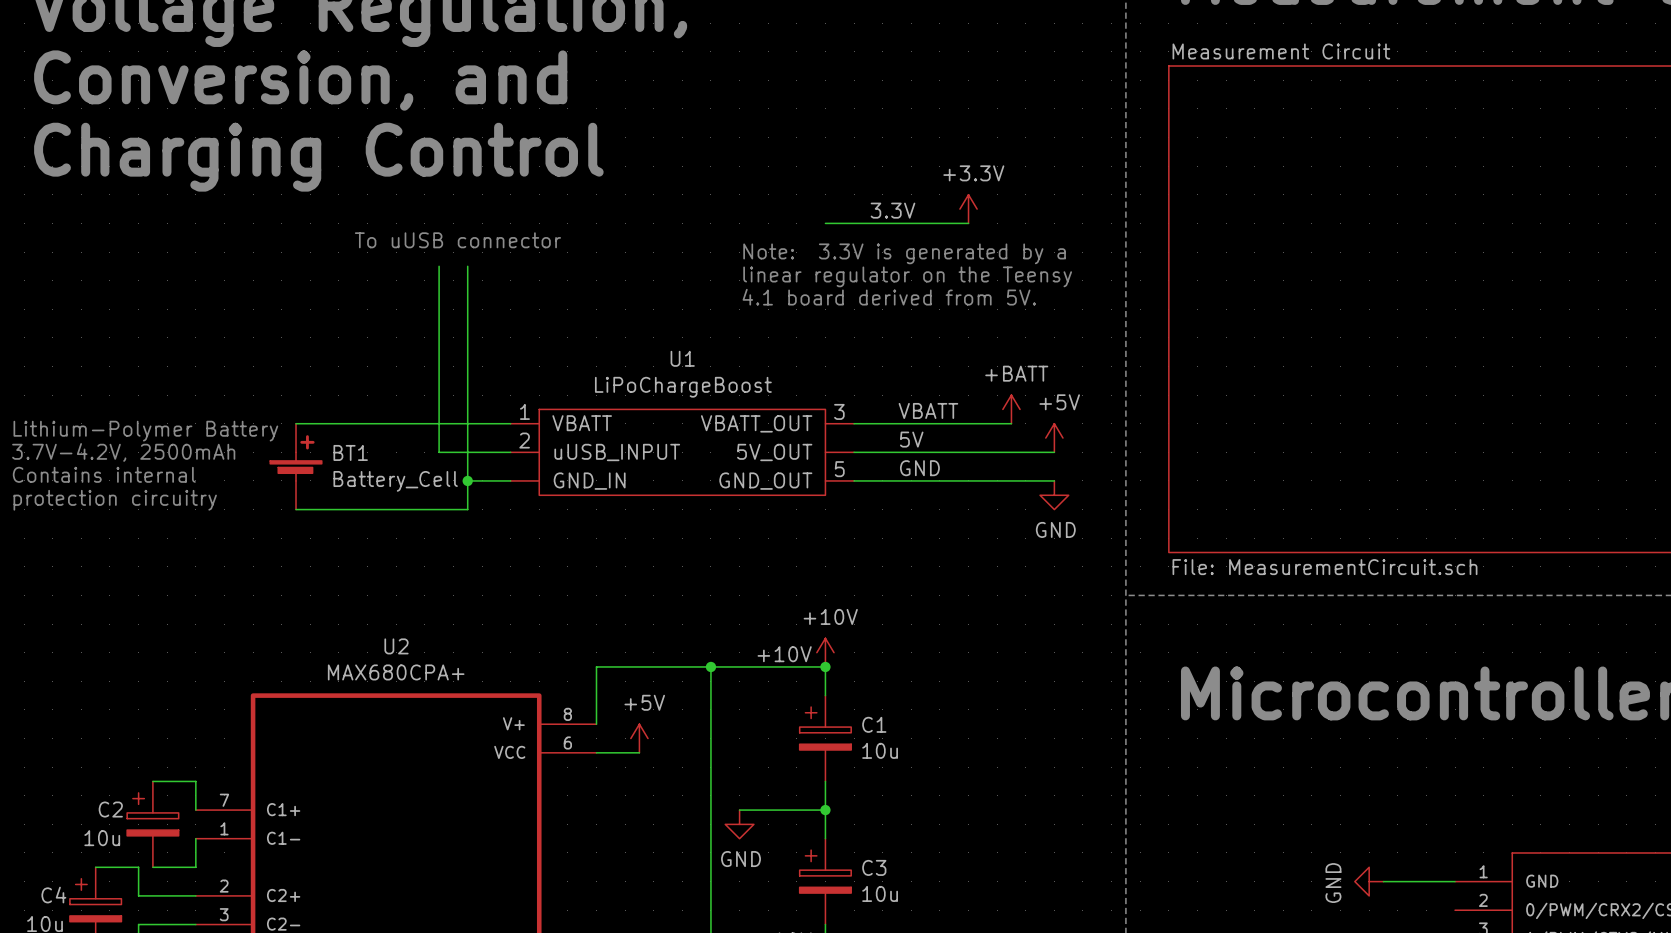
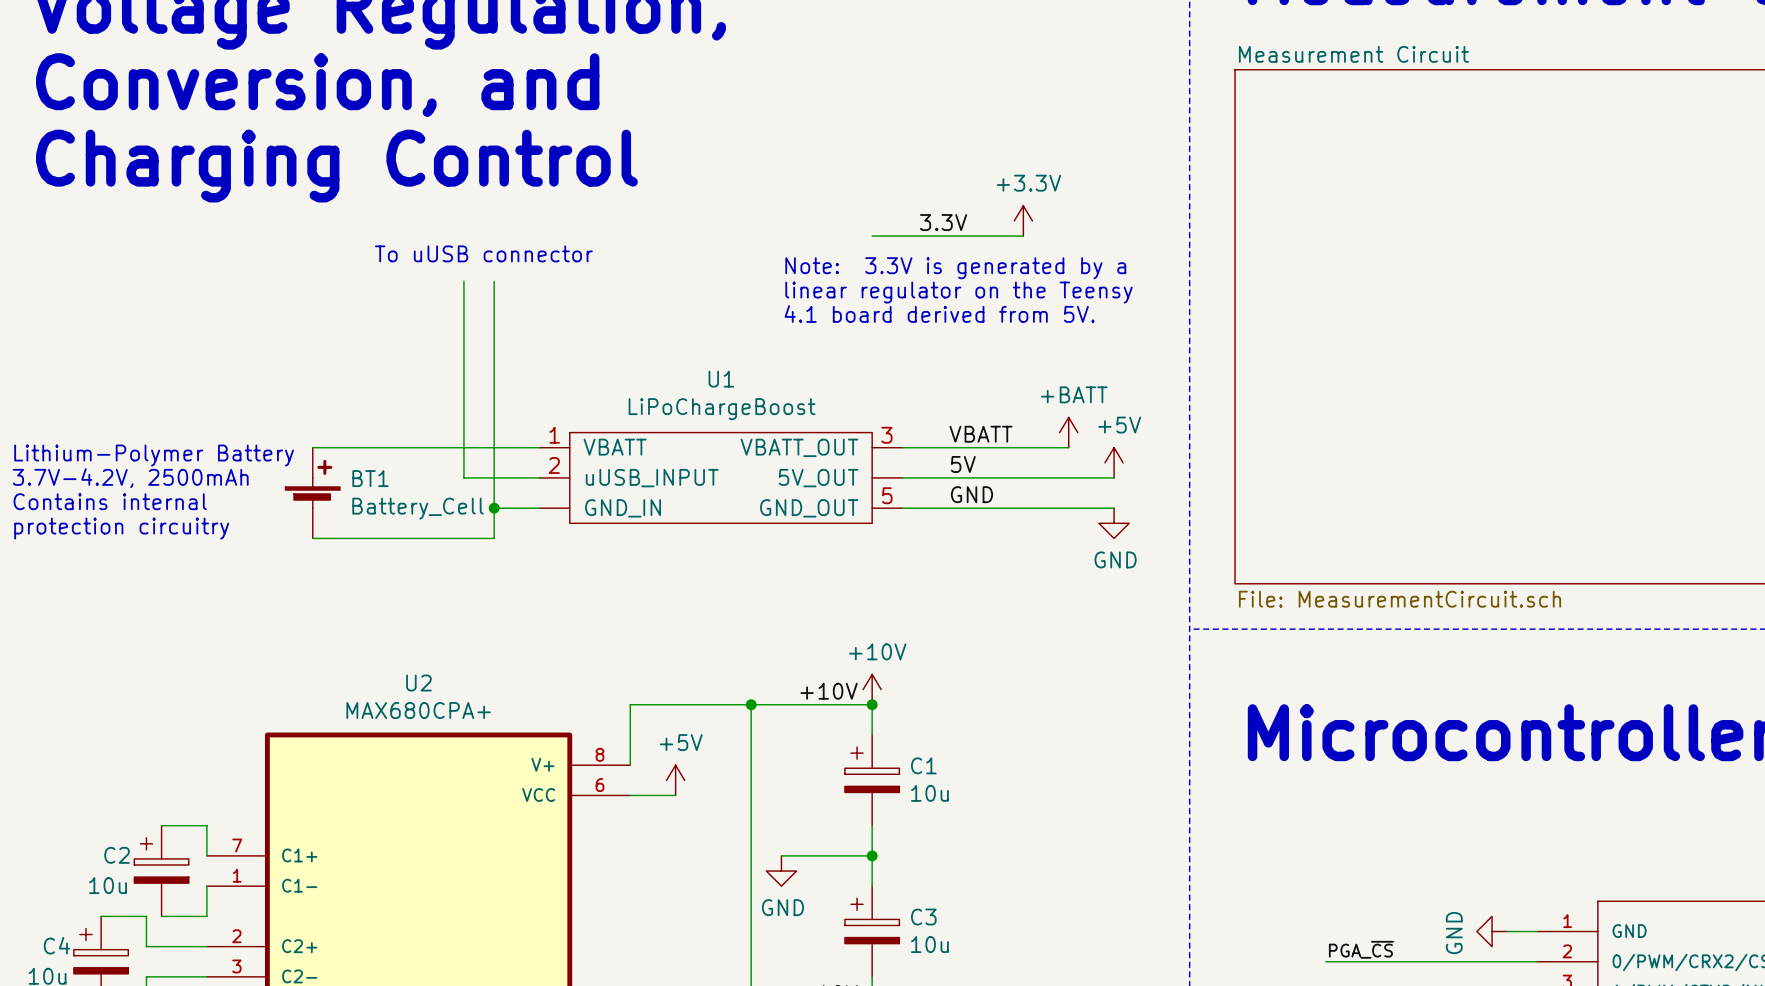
power symbol position: GND (1369, 881) -> GND (1492, 931)
wire: (1383, 881) (1426, 881) -> none
label: none -> PGA_~{CS} (1361, 949)
wire: none -> (1325, 961) (1537, 961)

